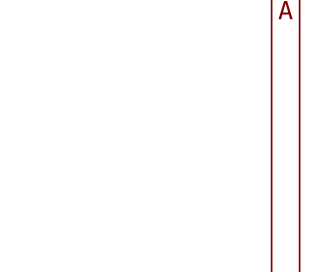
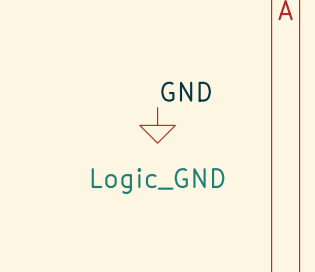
label: none -> GND (186, 91)
power symbol: none -> Logic_GND (157, 125)

